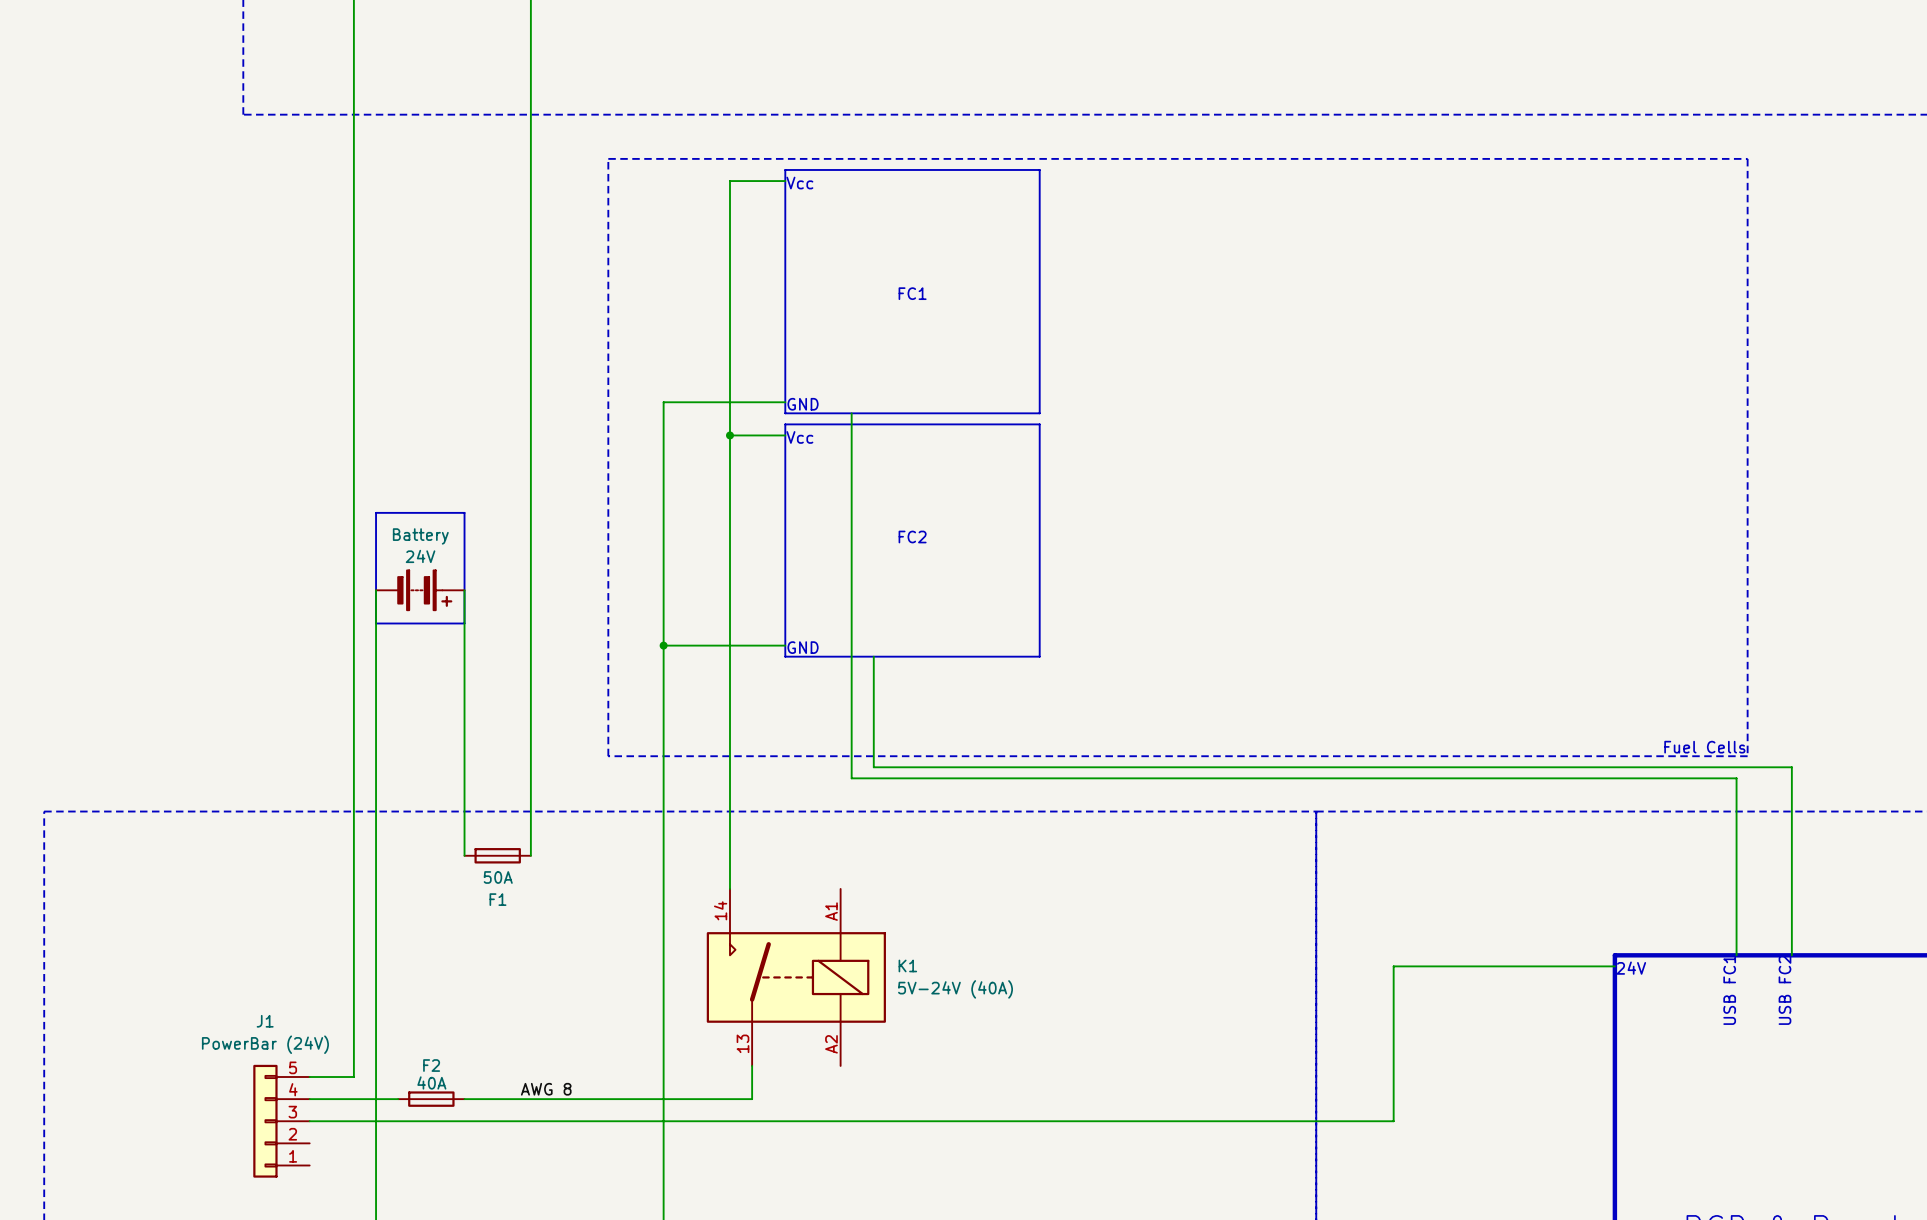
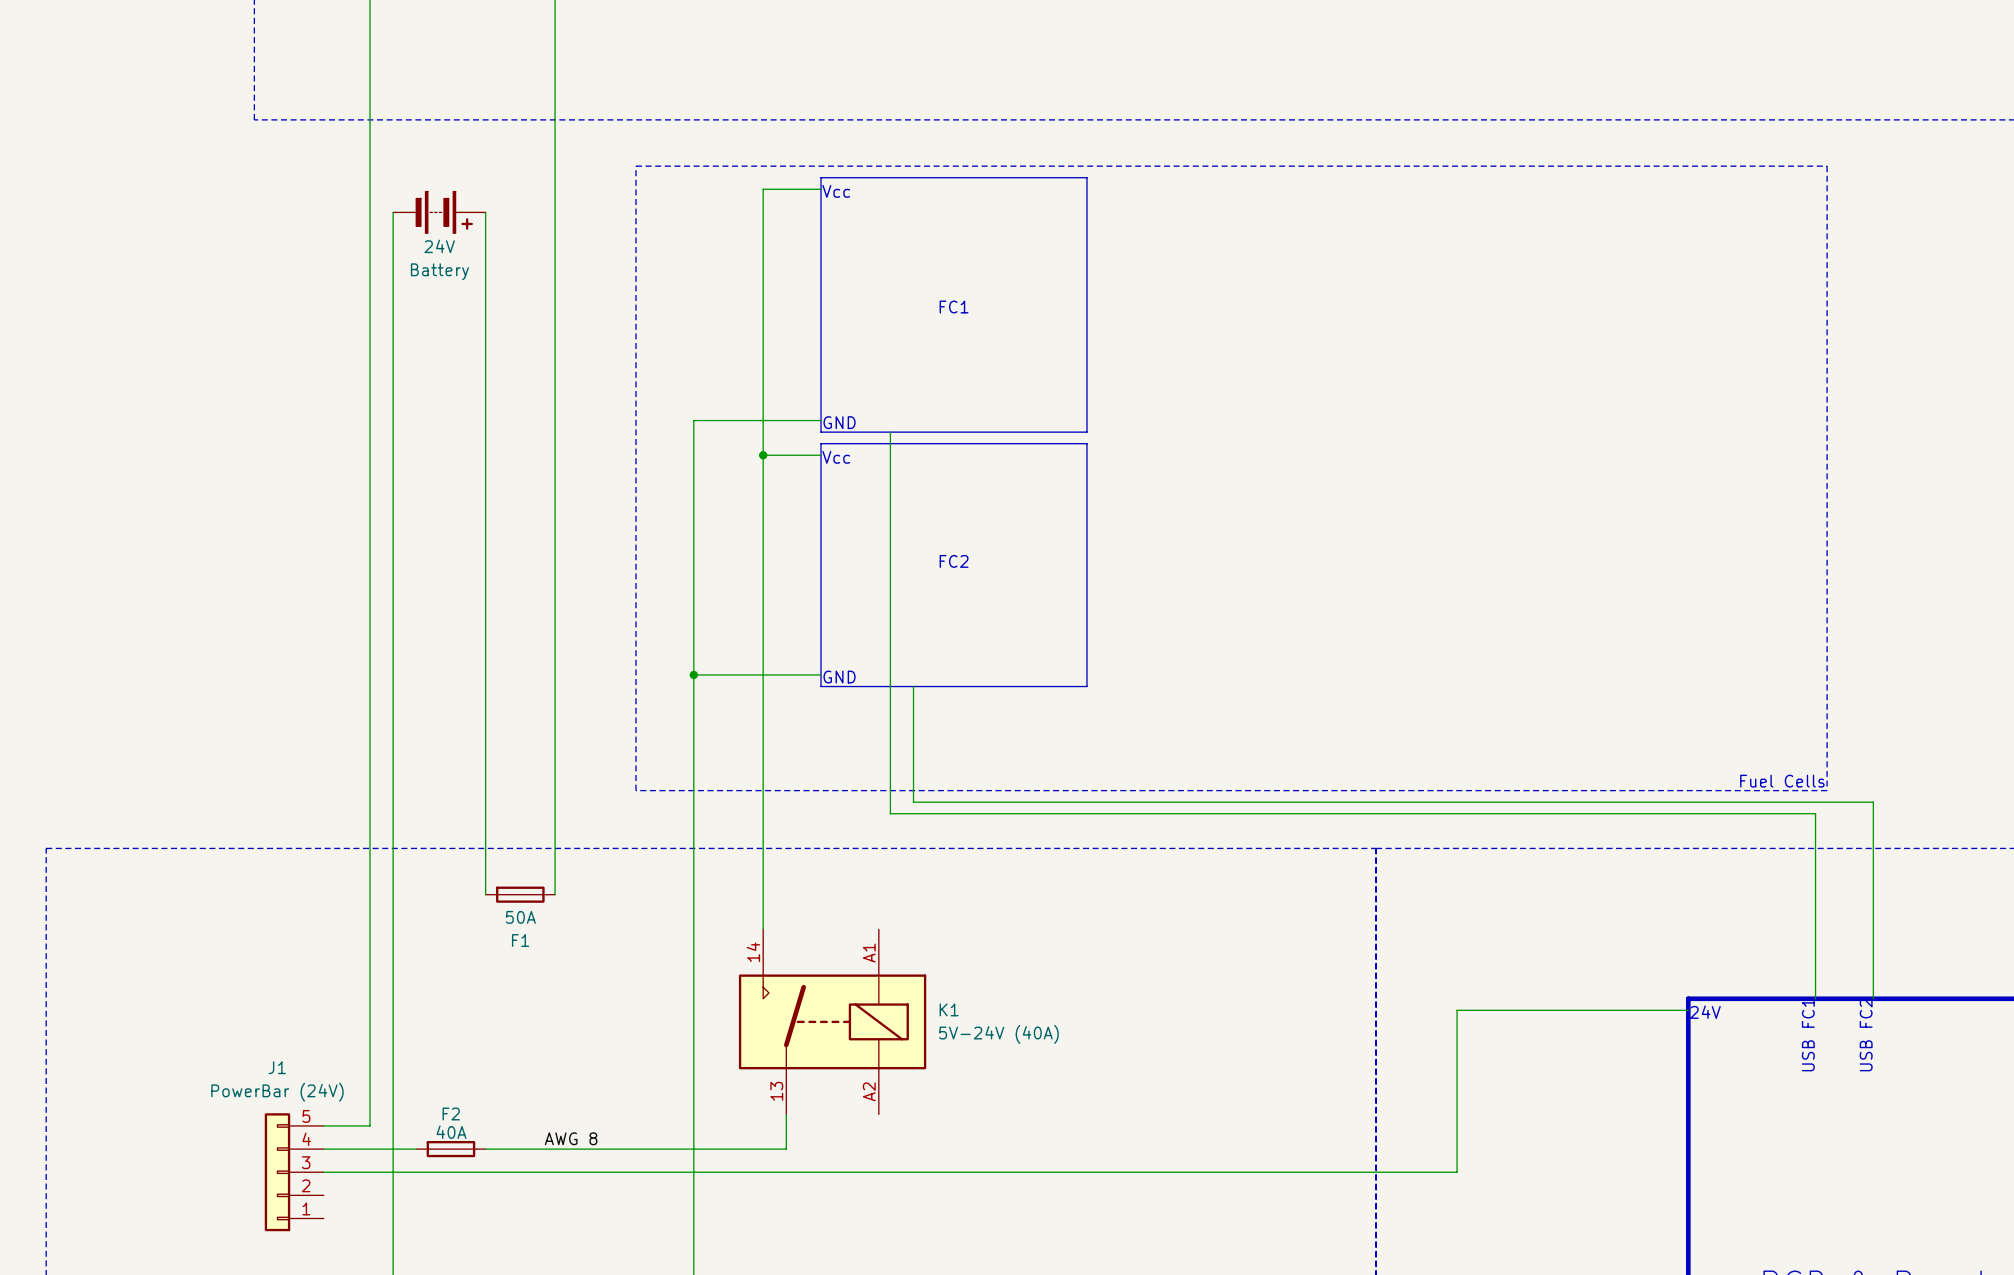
wire: none -> (393, 212) (393, 617)
part: none -> Battery (439, 212)
wire: none -> (485, 212) (485, 617)
line: (376, 512) (464, 512) (464, 623) (376, 623) (376, 512) -> none
part: Battery (420, 590) -> none

